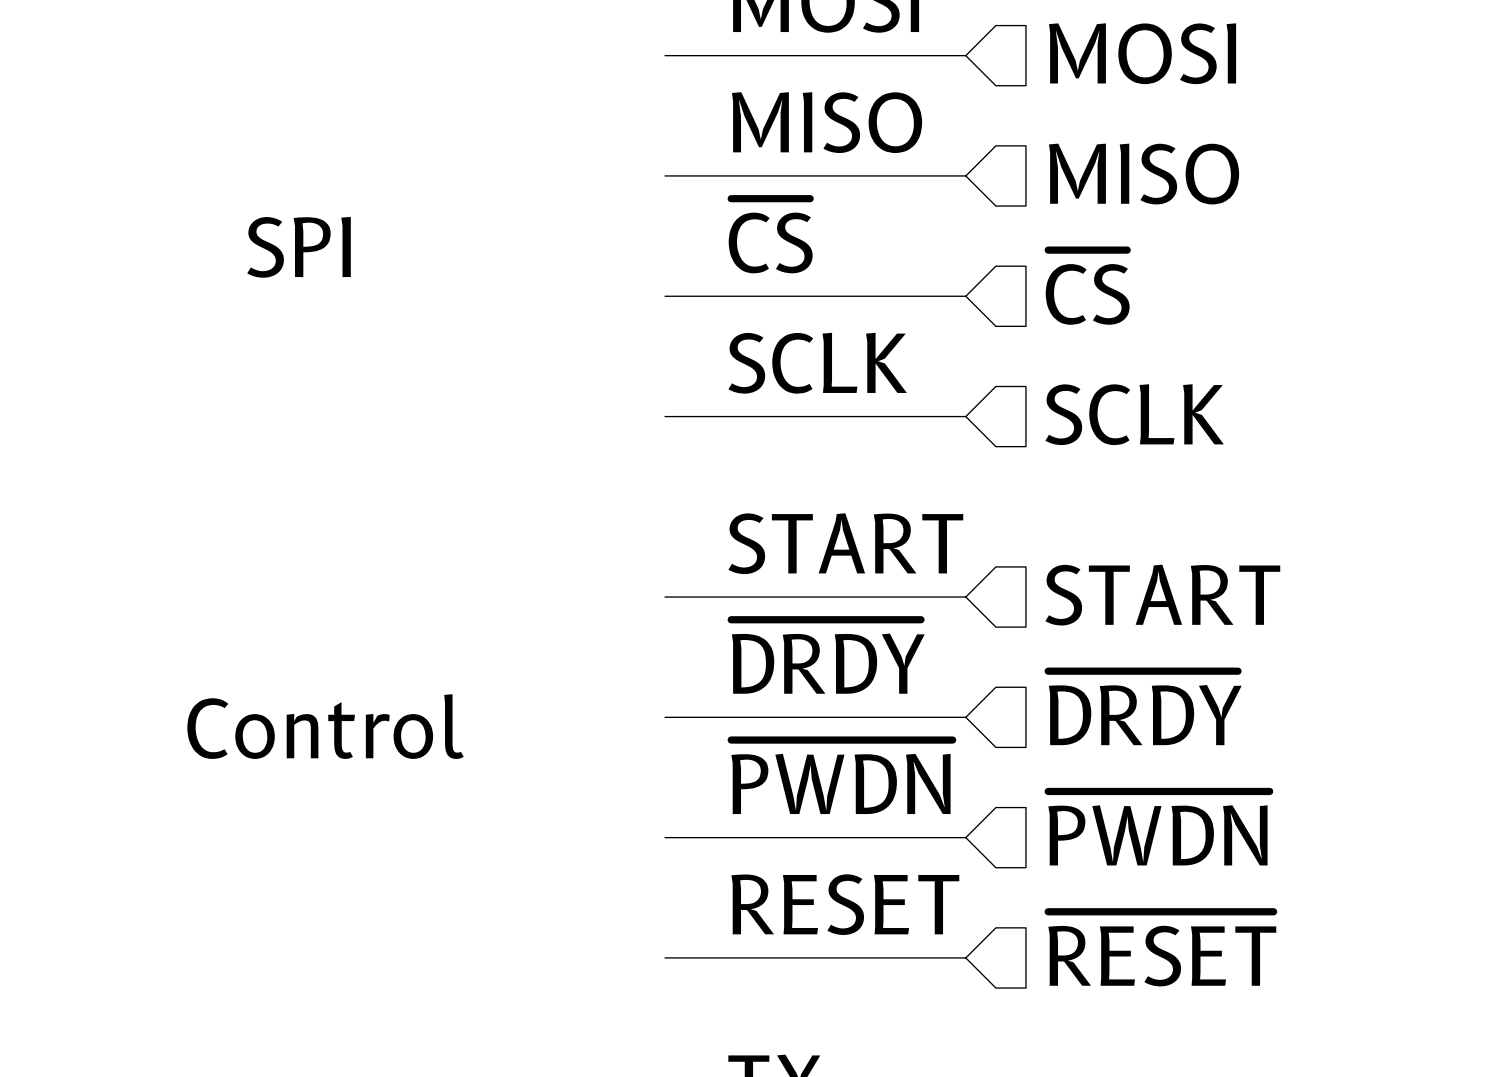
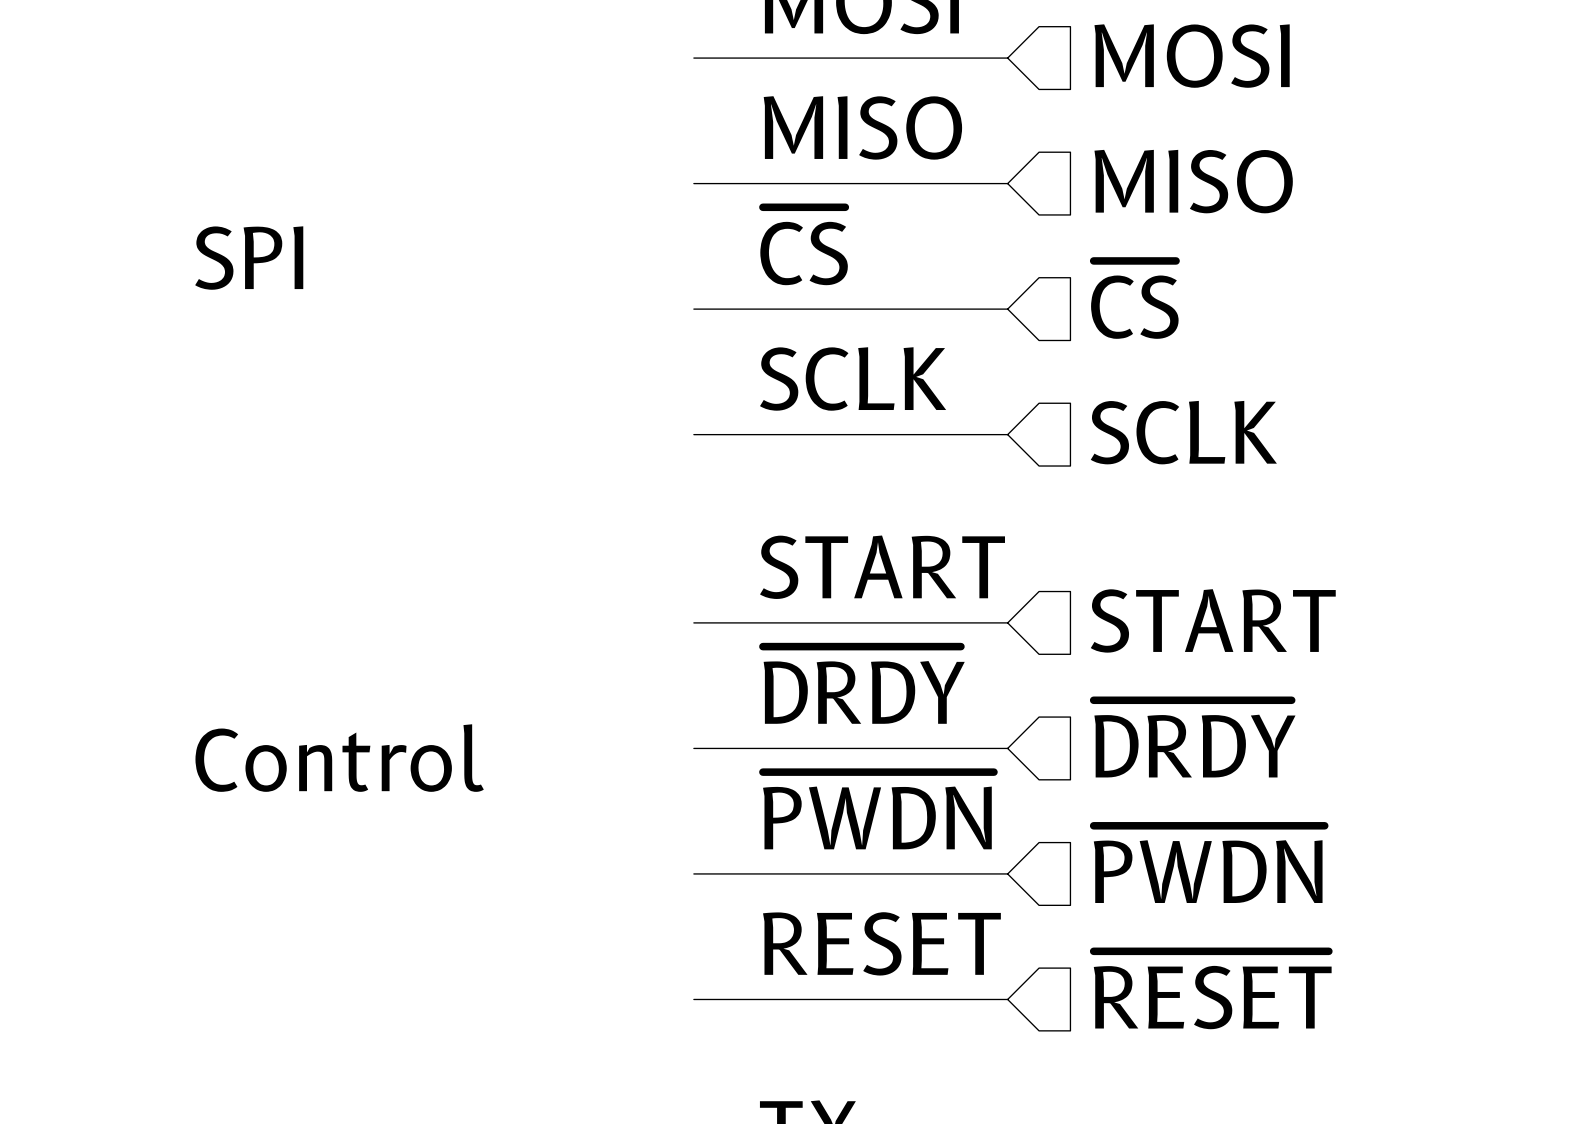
text position: SPI (299, 247) -> SPI (249, 258)

